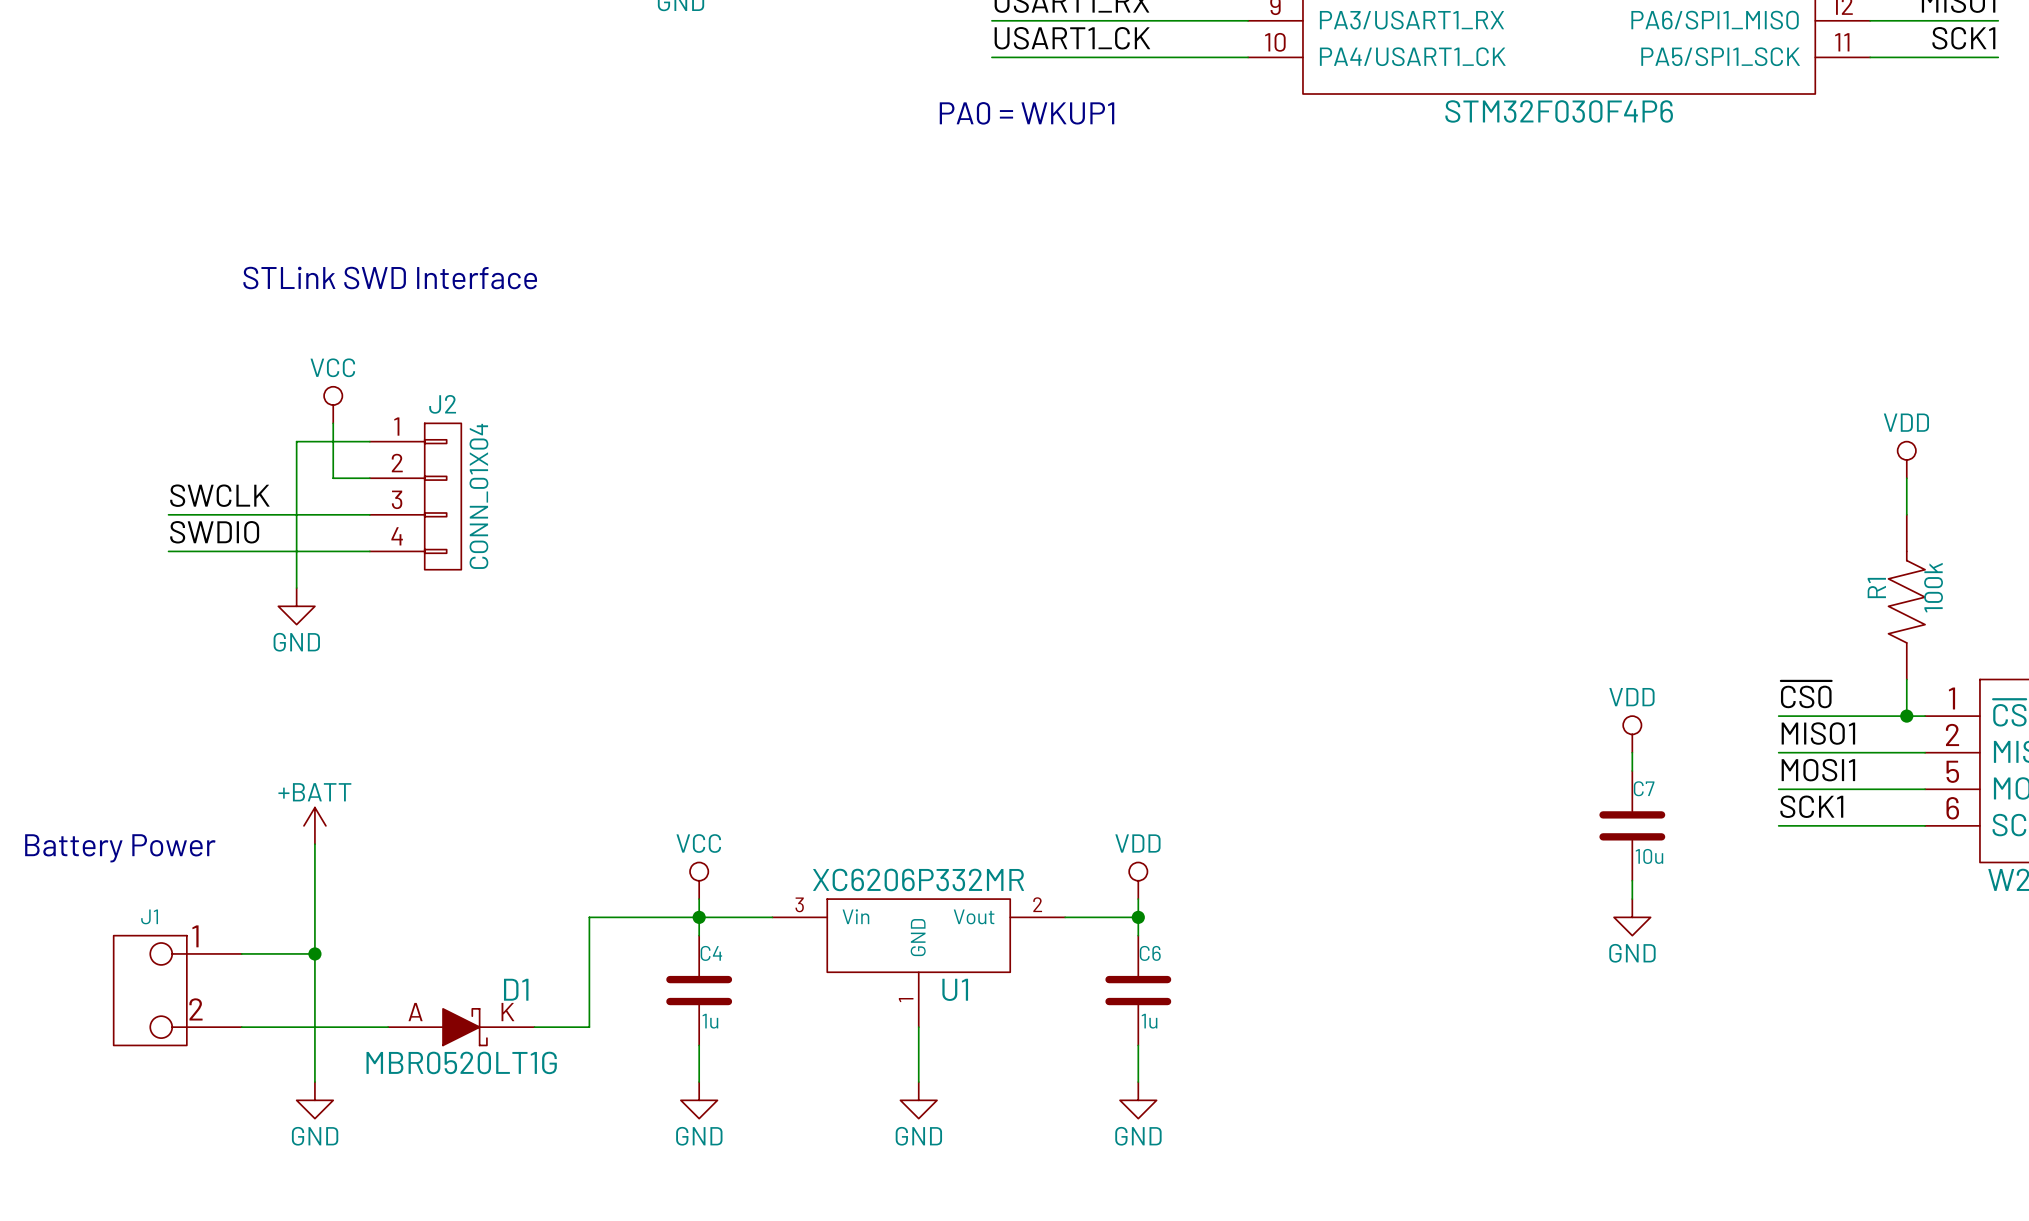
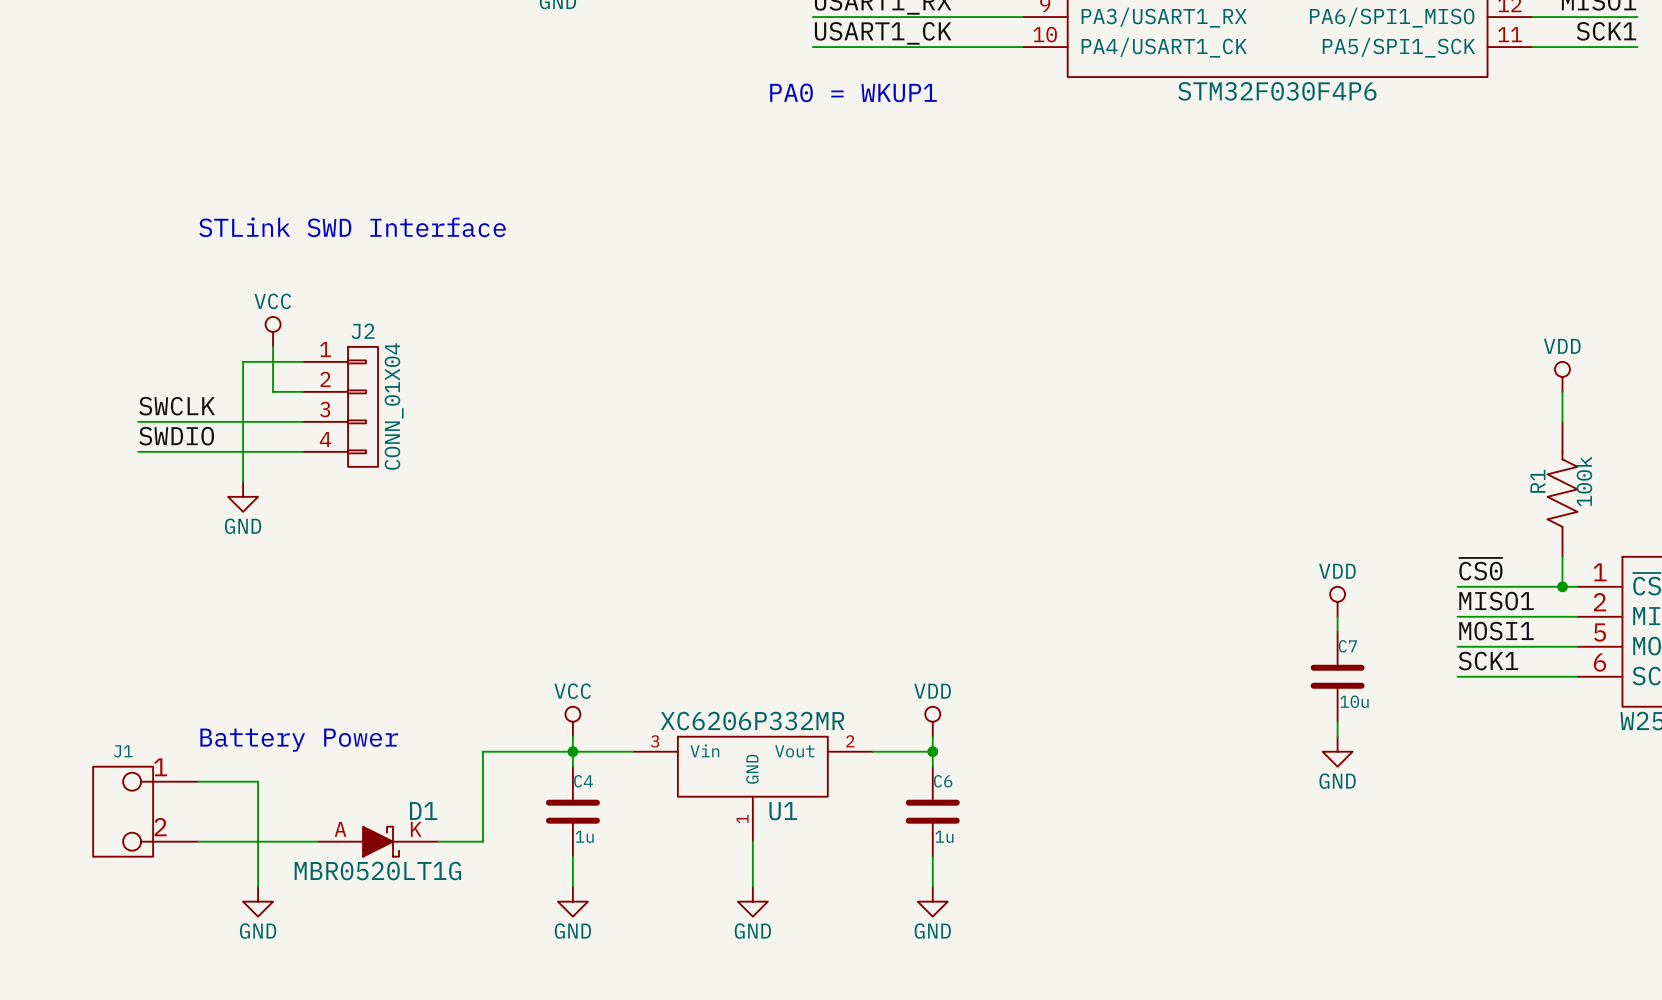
power symbol: +BATT (314, 825) -> none
wire: (314, 844) (314, 953) -> none
text position: Battery Power (120, 848) -> Battery Power (299, 740)
junction: (314, 953) -> none

